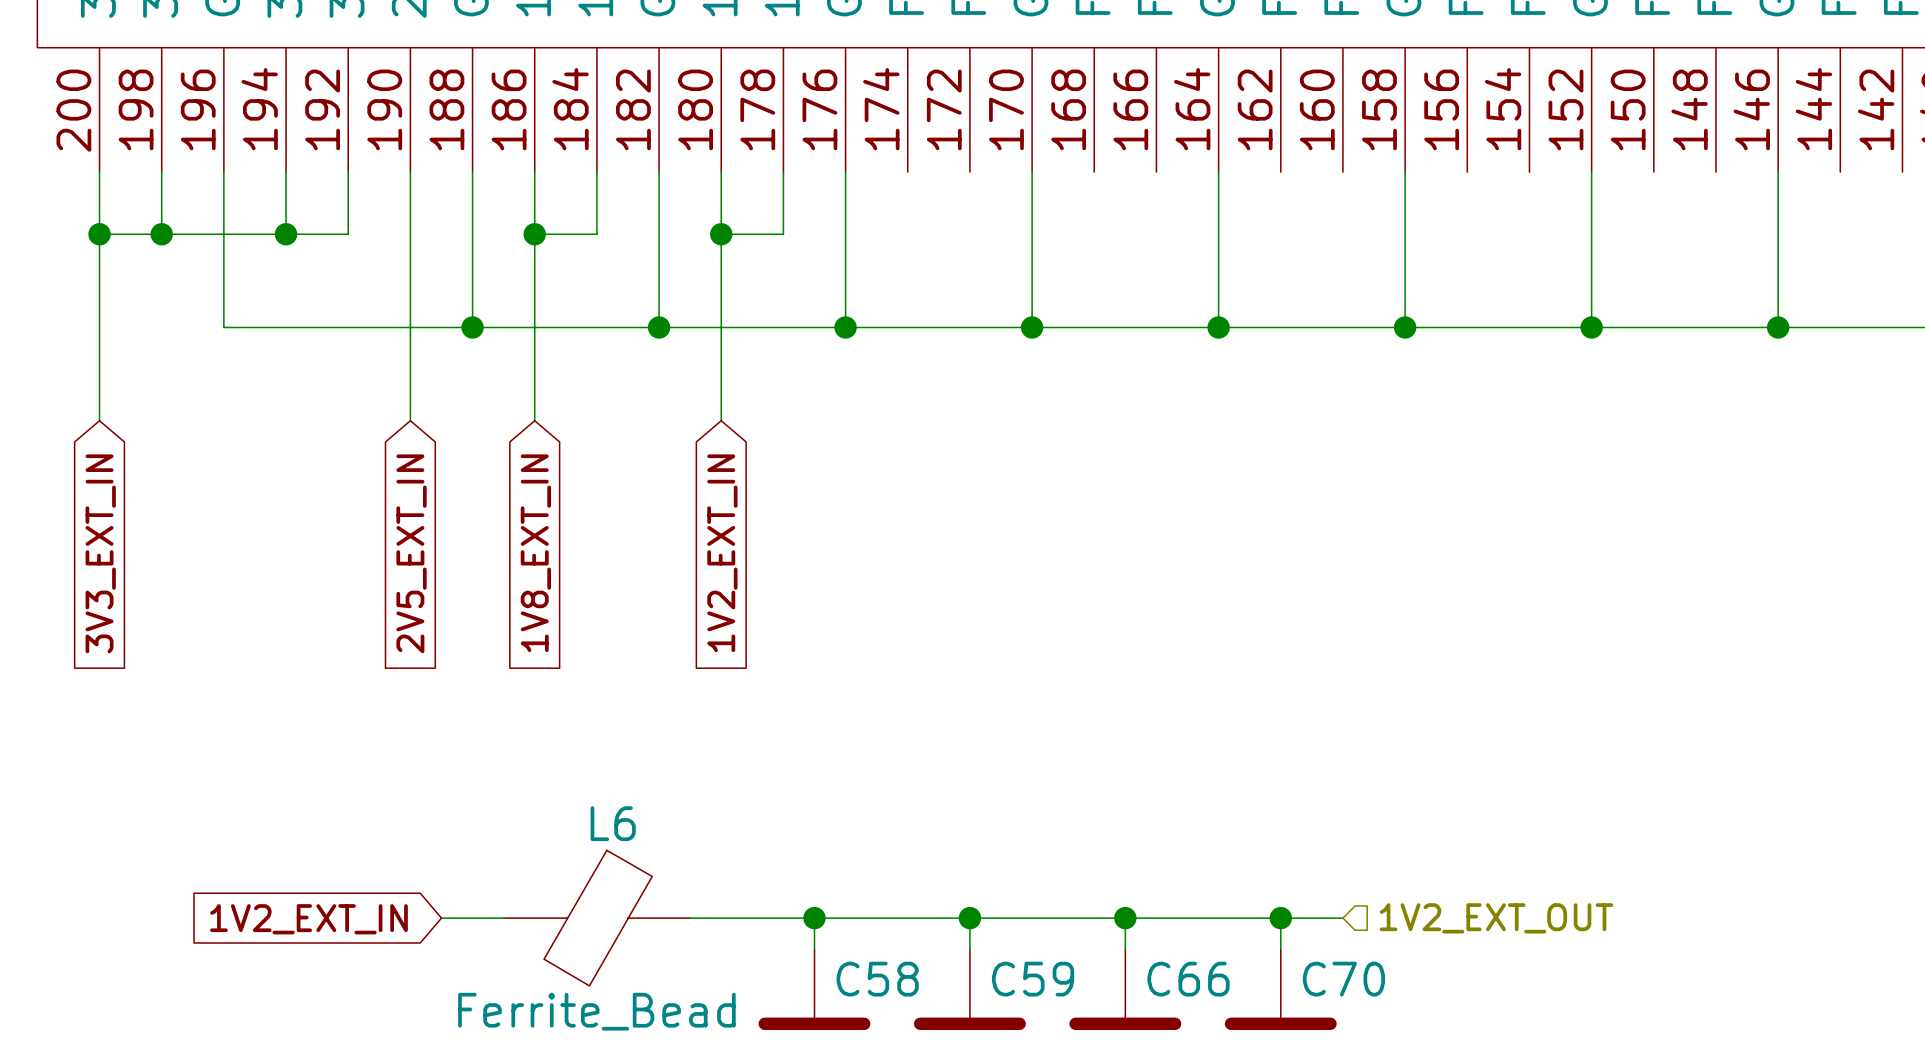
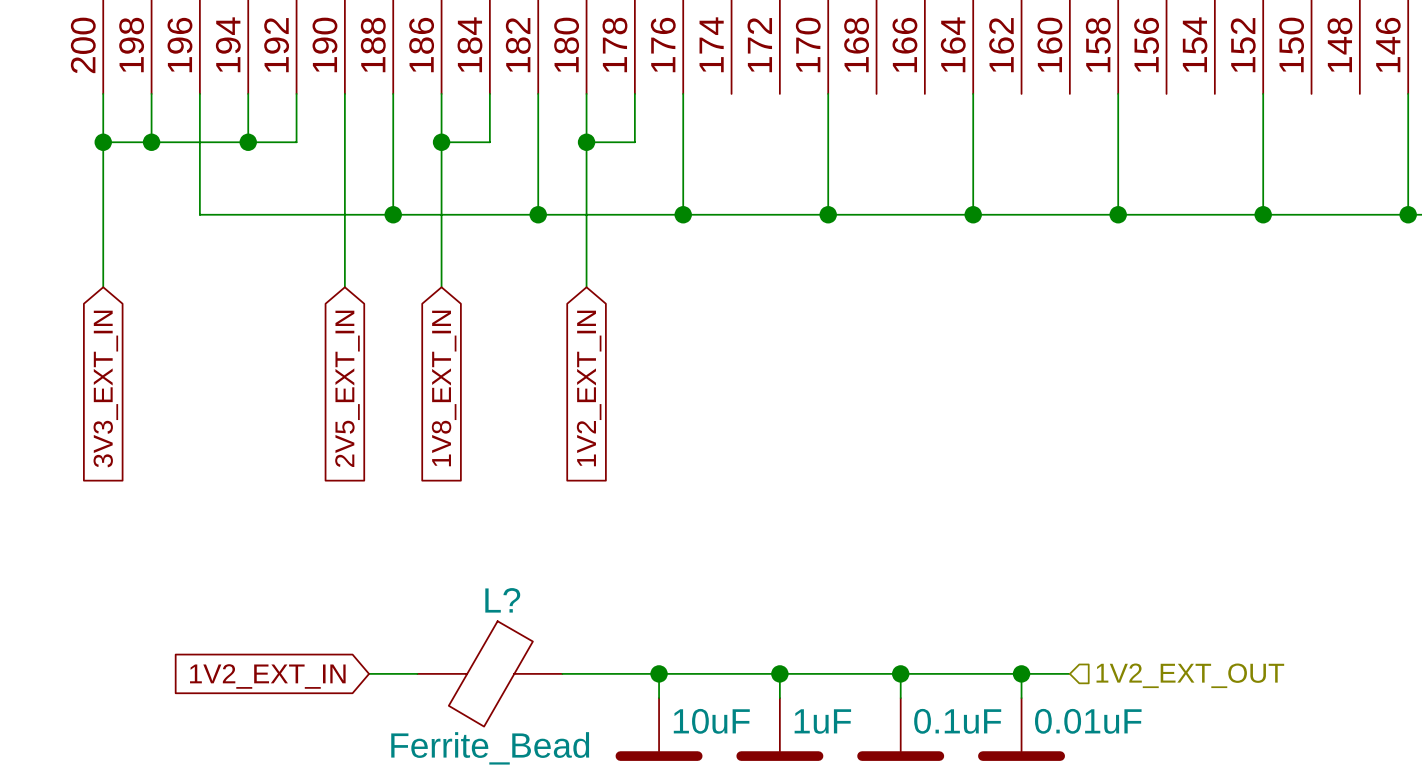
L6 name: L6 (613, 823) -> L? (502, 600)
C58 name: C58 (877, 979) -> 10uF (711, 721)
C59 name: C59 (1033, 979) -> 1uF (822, 721)
C66 name: C66 (1188, 979) -> 0.1uF (957, 721)
C70 name: C70 (1343, 979) -> 0.01uF (1088, 721)

